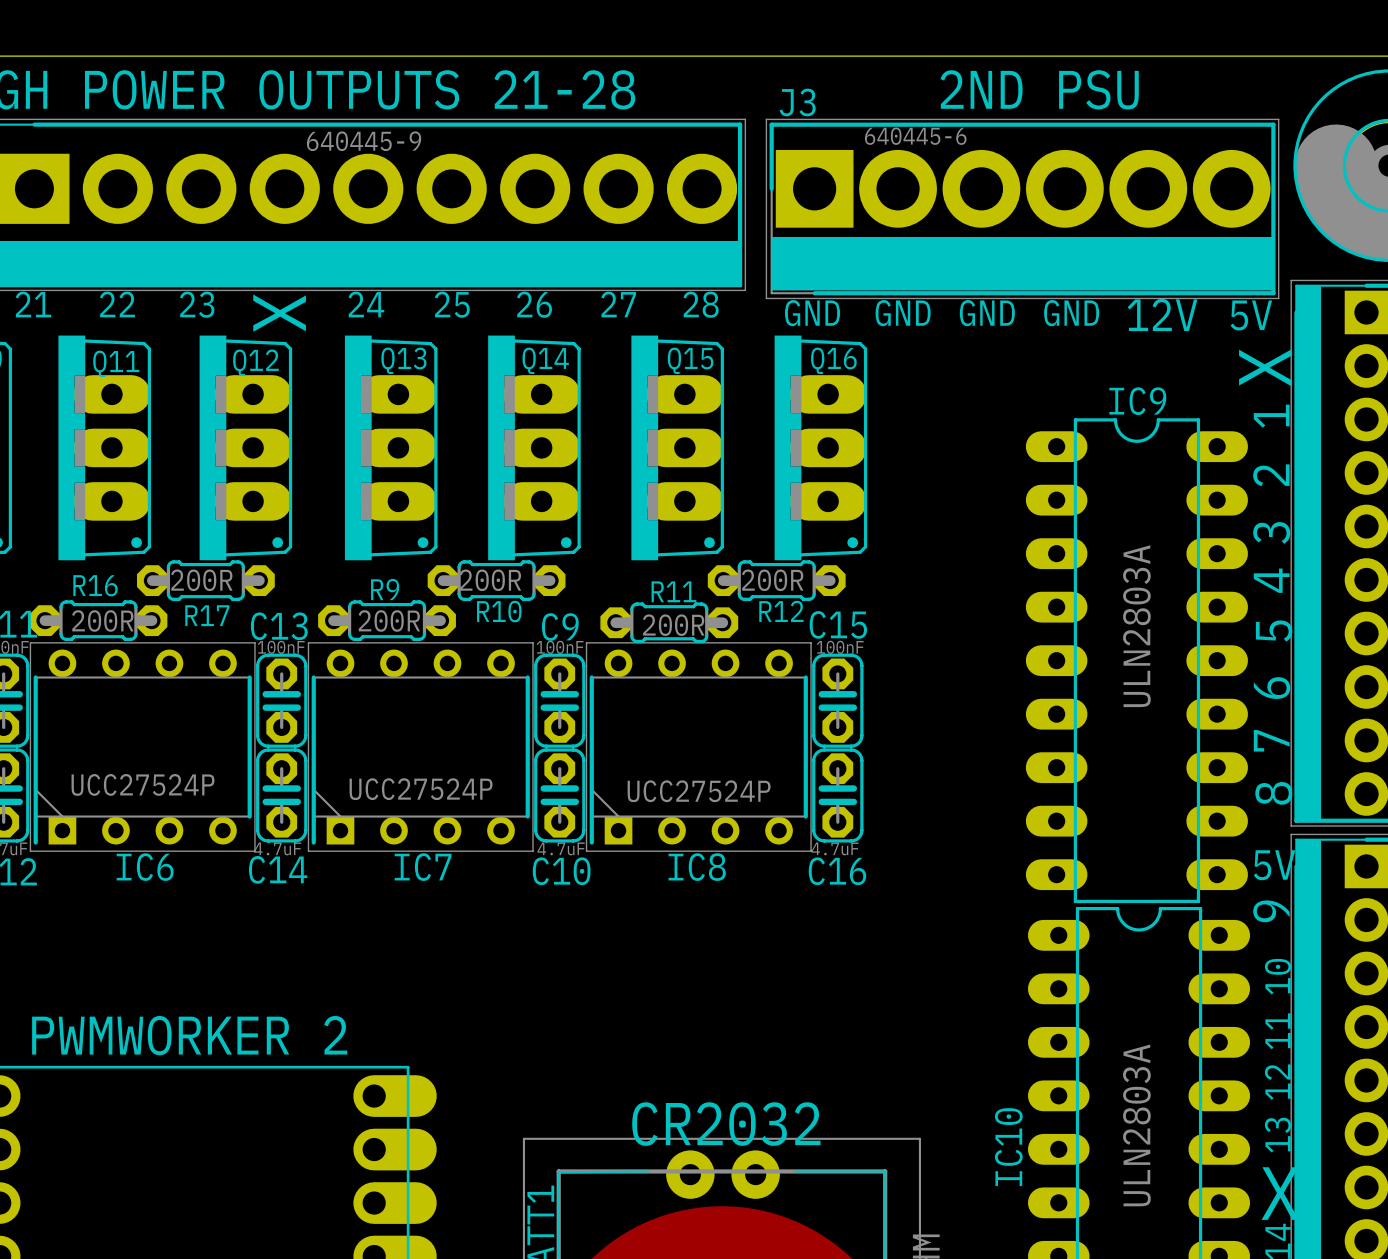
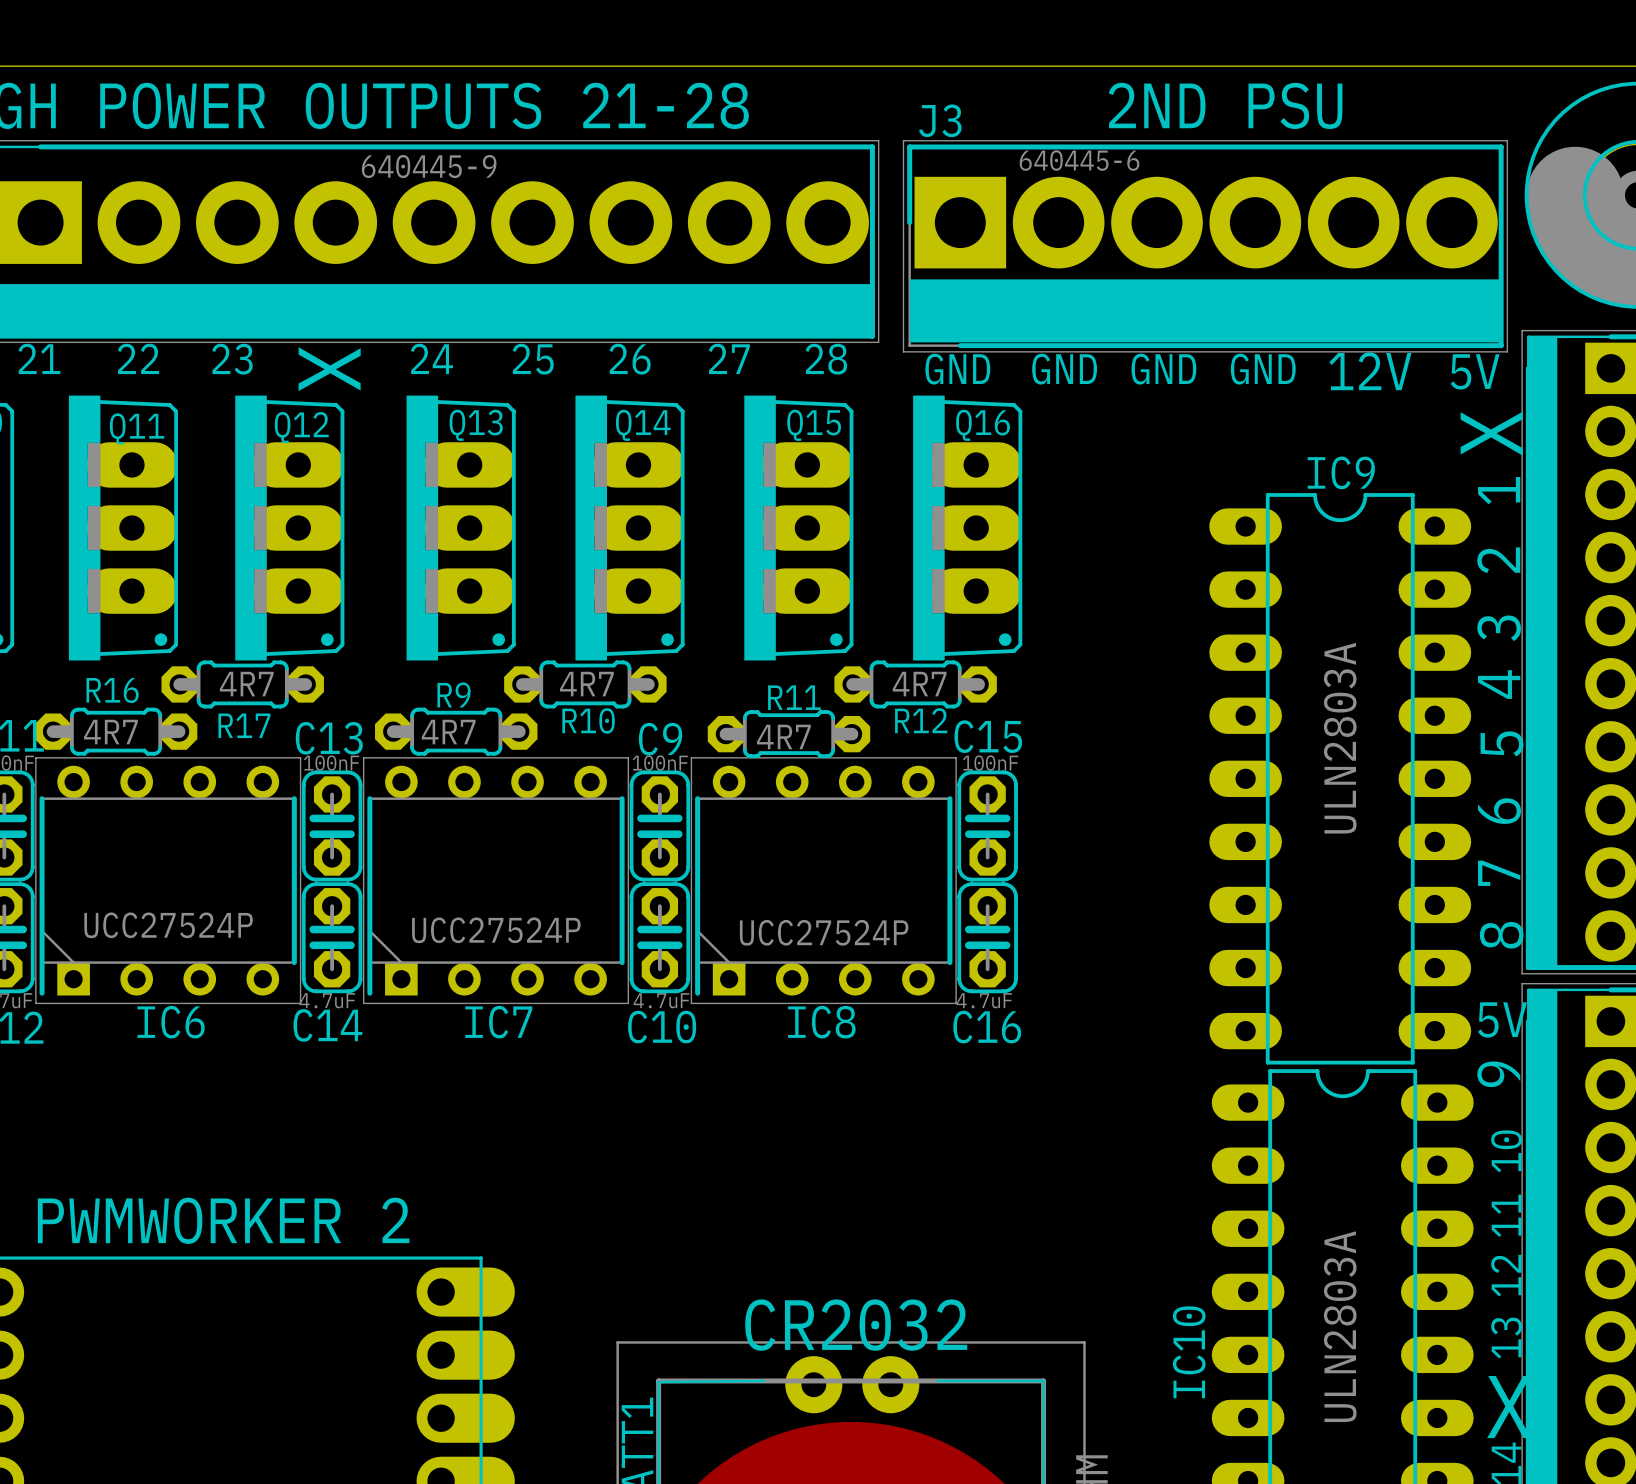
R17 value: 200R (201, 580) -> 4R7 (246, 684)
R10 value: 200R (490, 580) -> 4R7 (586, 684)
R12 value: 200R (772, 580) -> 4R7 (919, 684)
R16 value: 200R (102, 620) -> 4R7 (110, 732)
R9 value: 200R (389, 620) -> 4R7 (448, 732)
R11 value: 200R (673, 625) -> 4R7 (783, 737)

